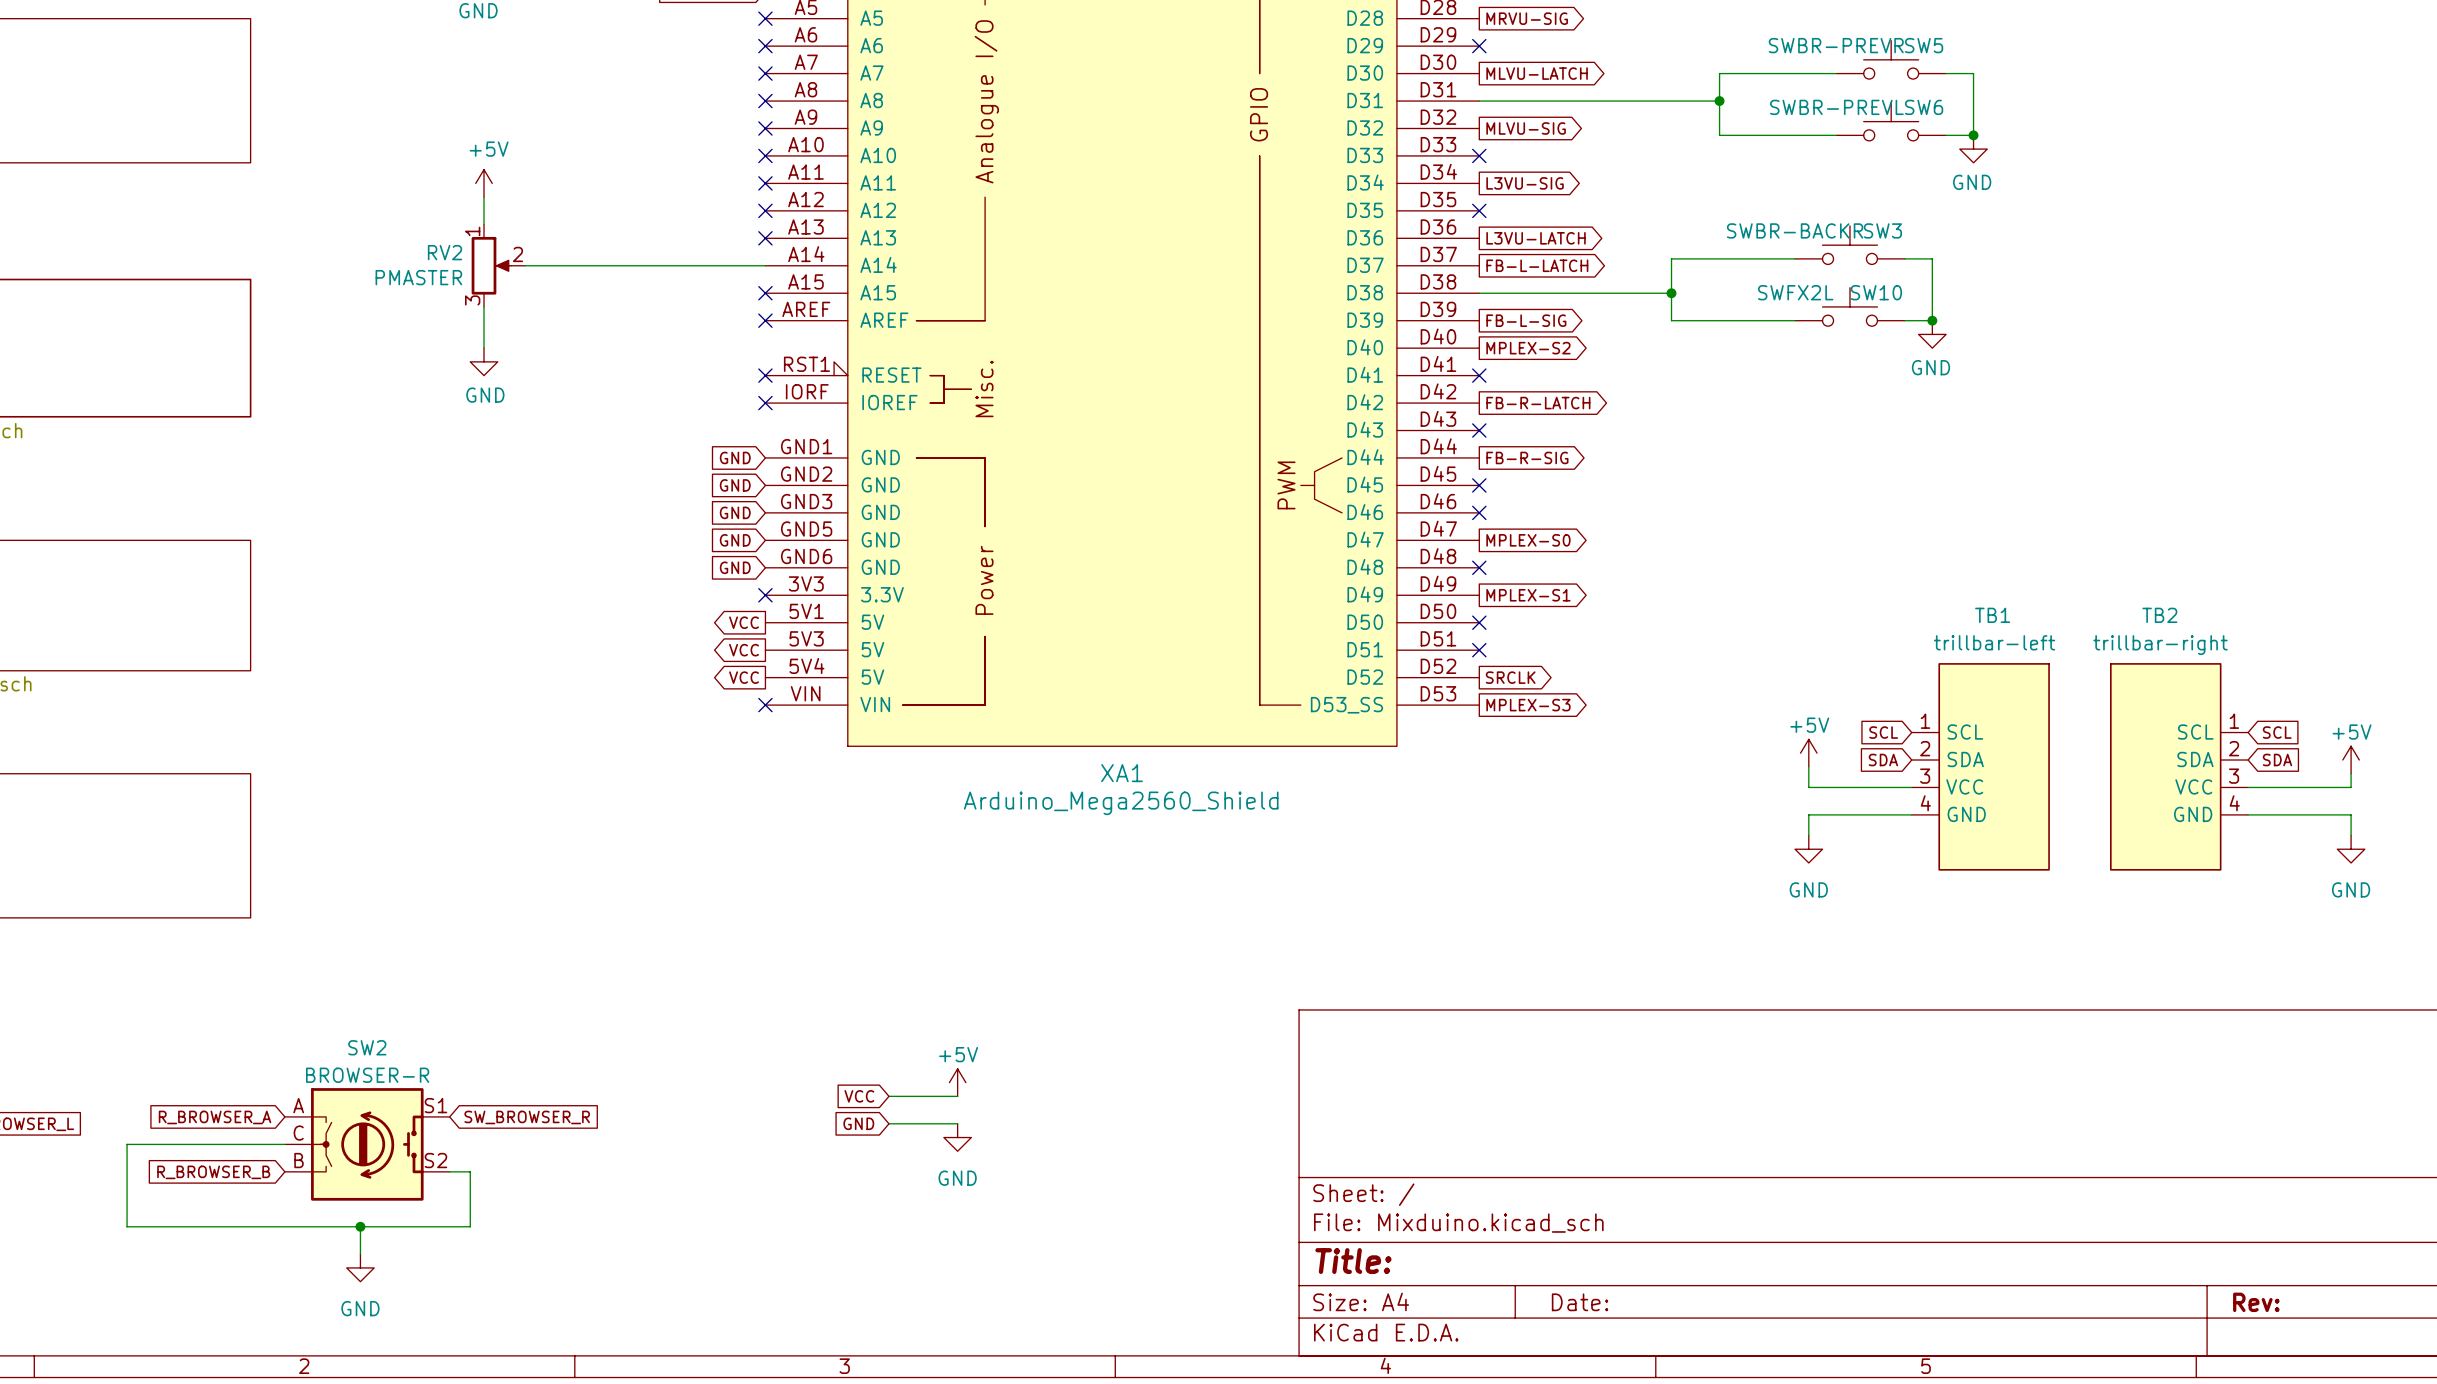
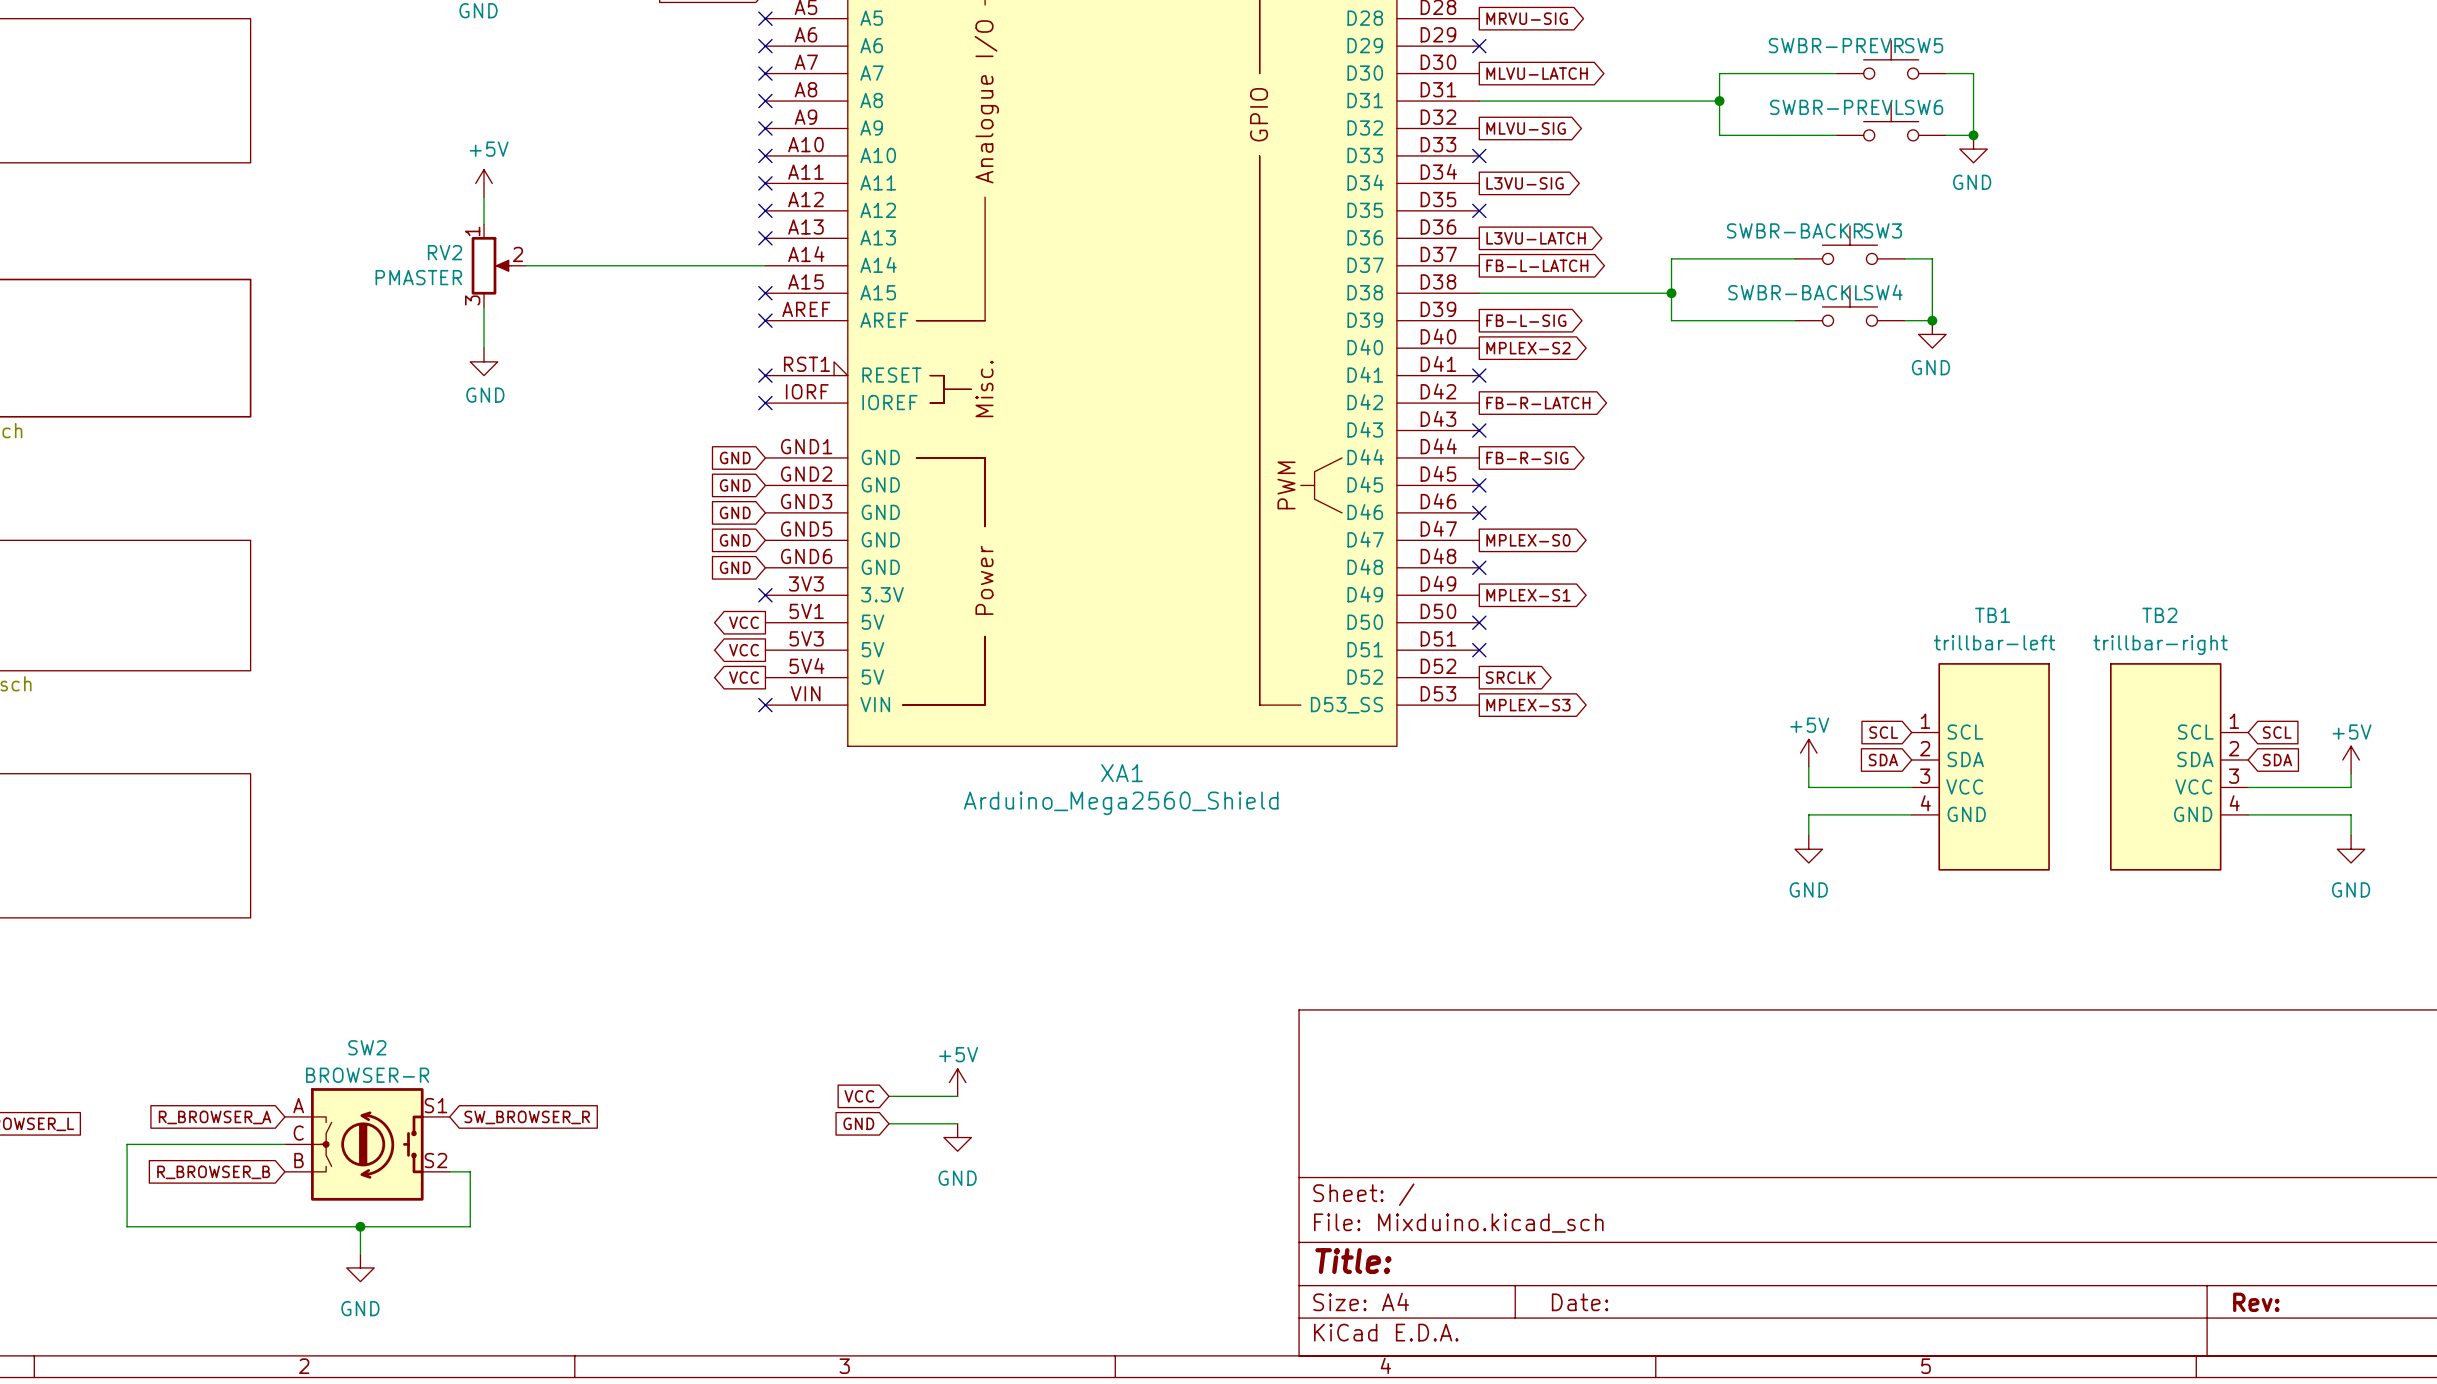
SW10 value: SWFX2L (1795, 292) -> SWBR-BACKL (1795, 292)
SW10 name: SW10 (1876, 292) -> SW4 (1883, 292)

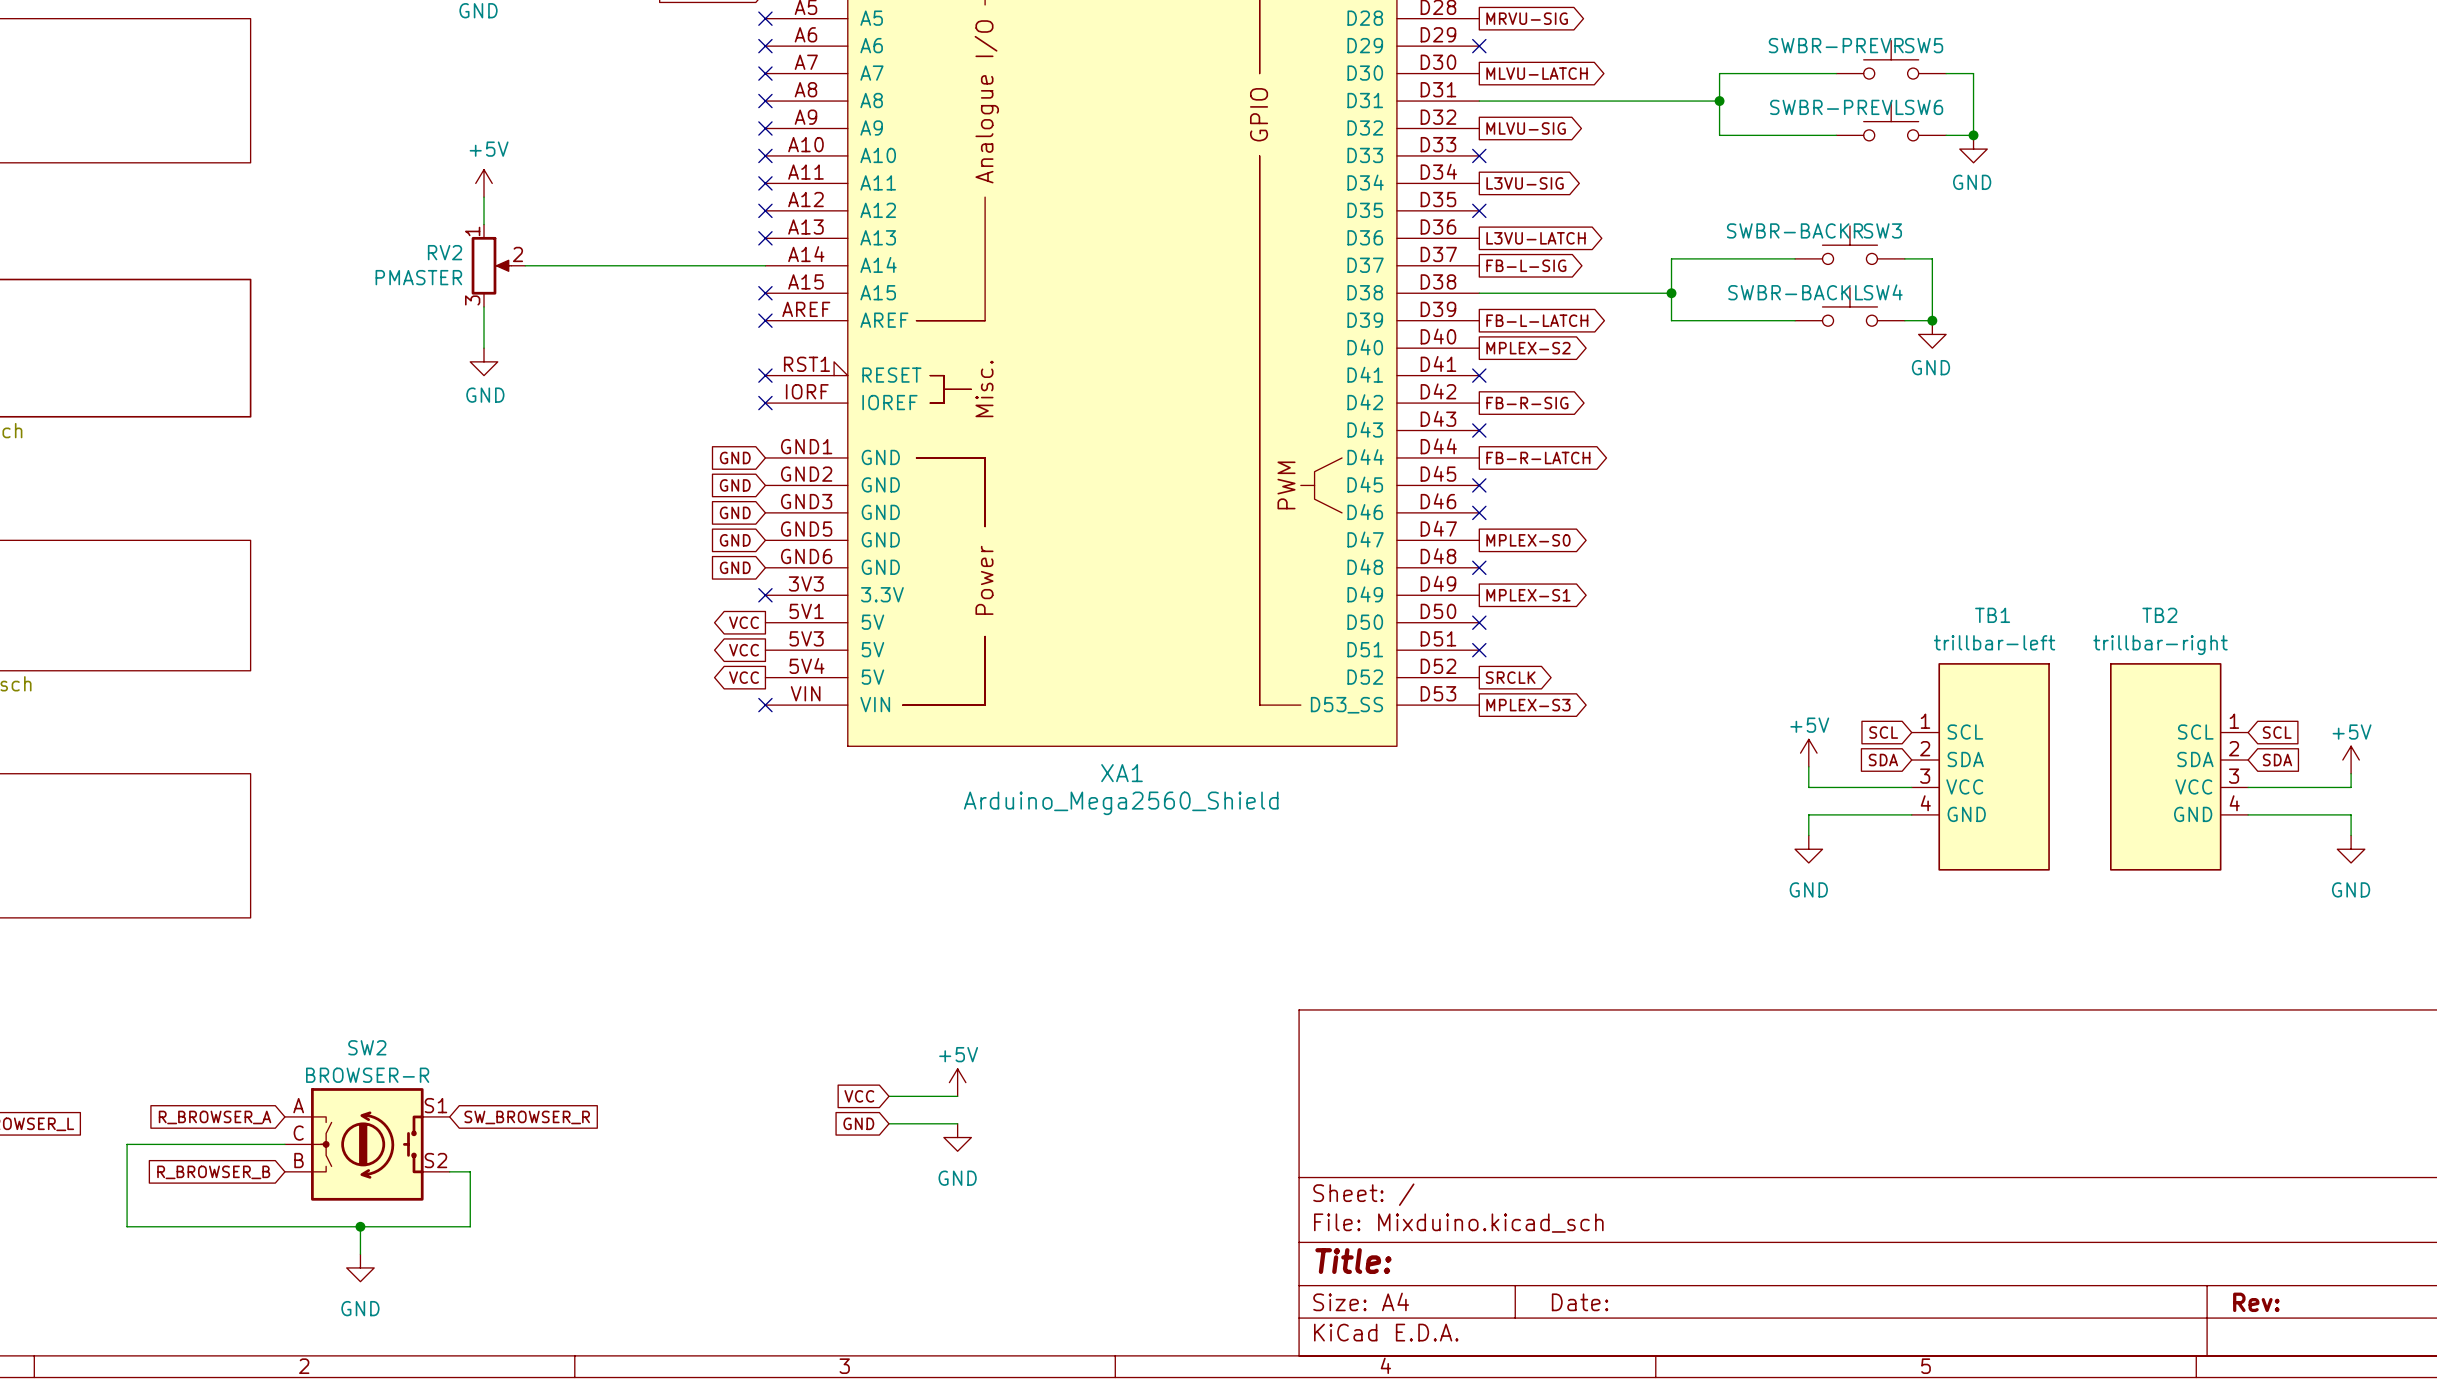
global label: FB-L-LATCH (1537, 265) -> FB-L-SIG (1526, 265)
global label: FB-L-SIG (1526, 320) -> FB-L-LATCH (1537, 320)
global label: FB-R-LATCH (1538, 403) -> FB-R-SIG (1527, 403)
global label: FB-R-SIG (1527, 457) -> FB-R-LATCH (1538, 457)

